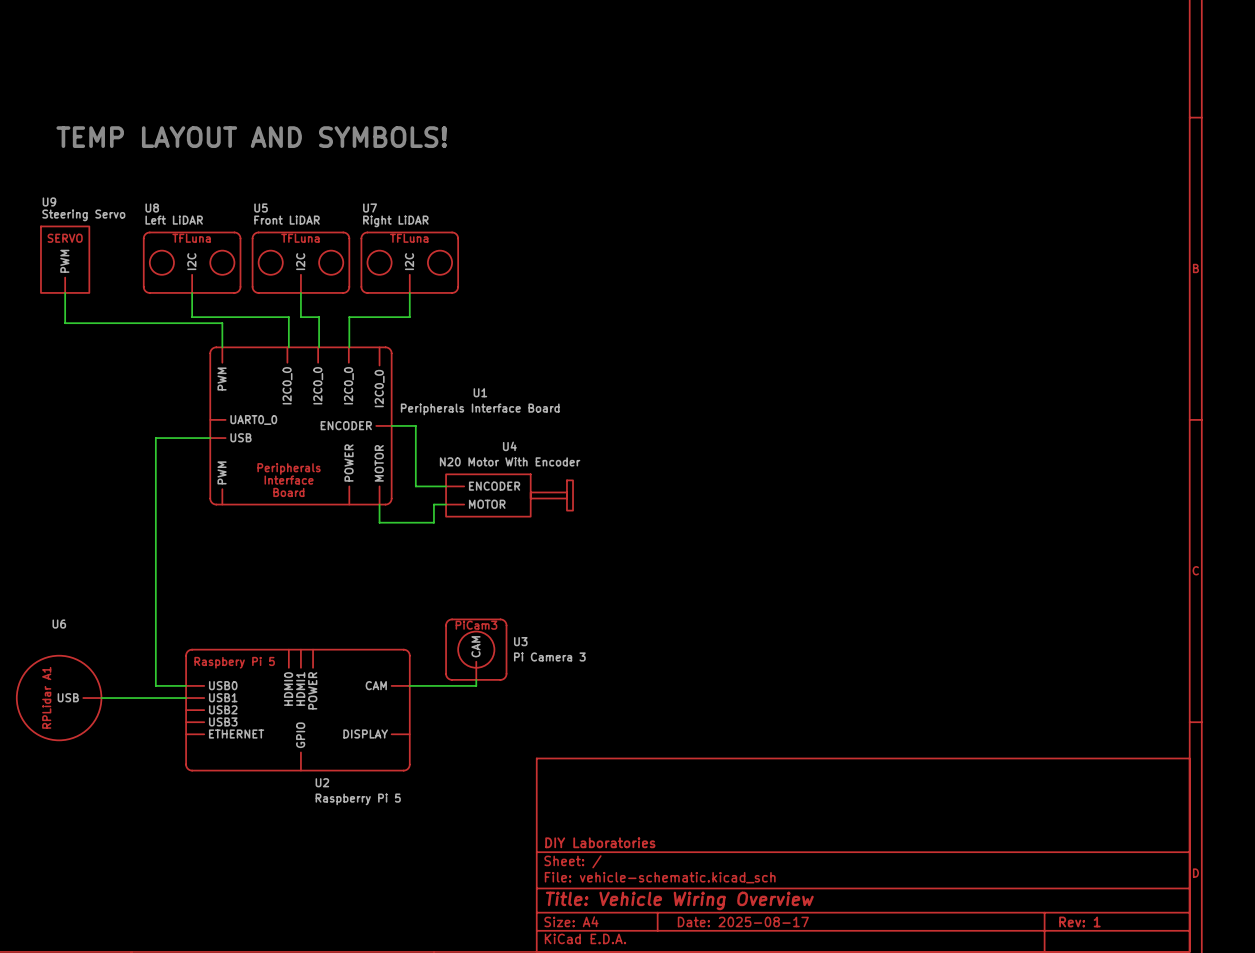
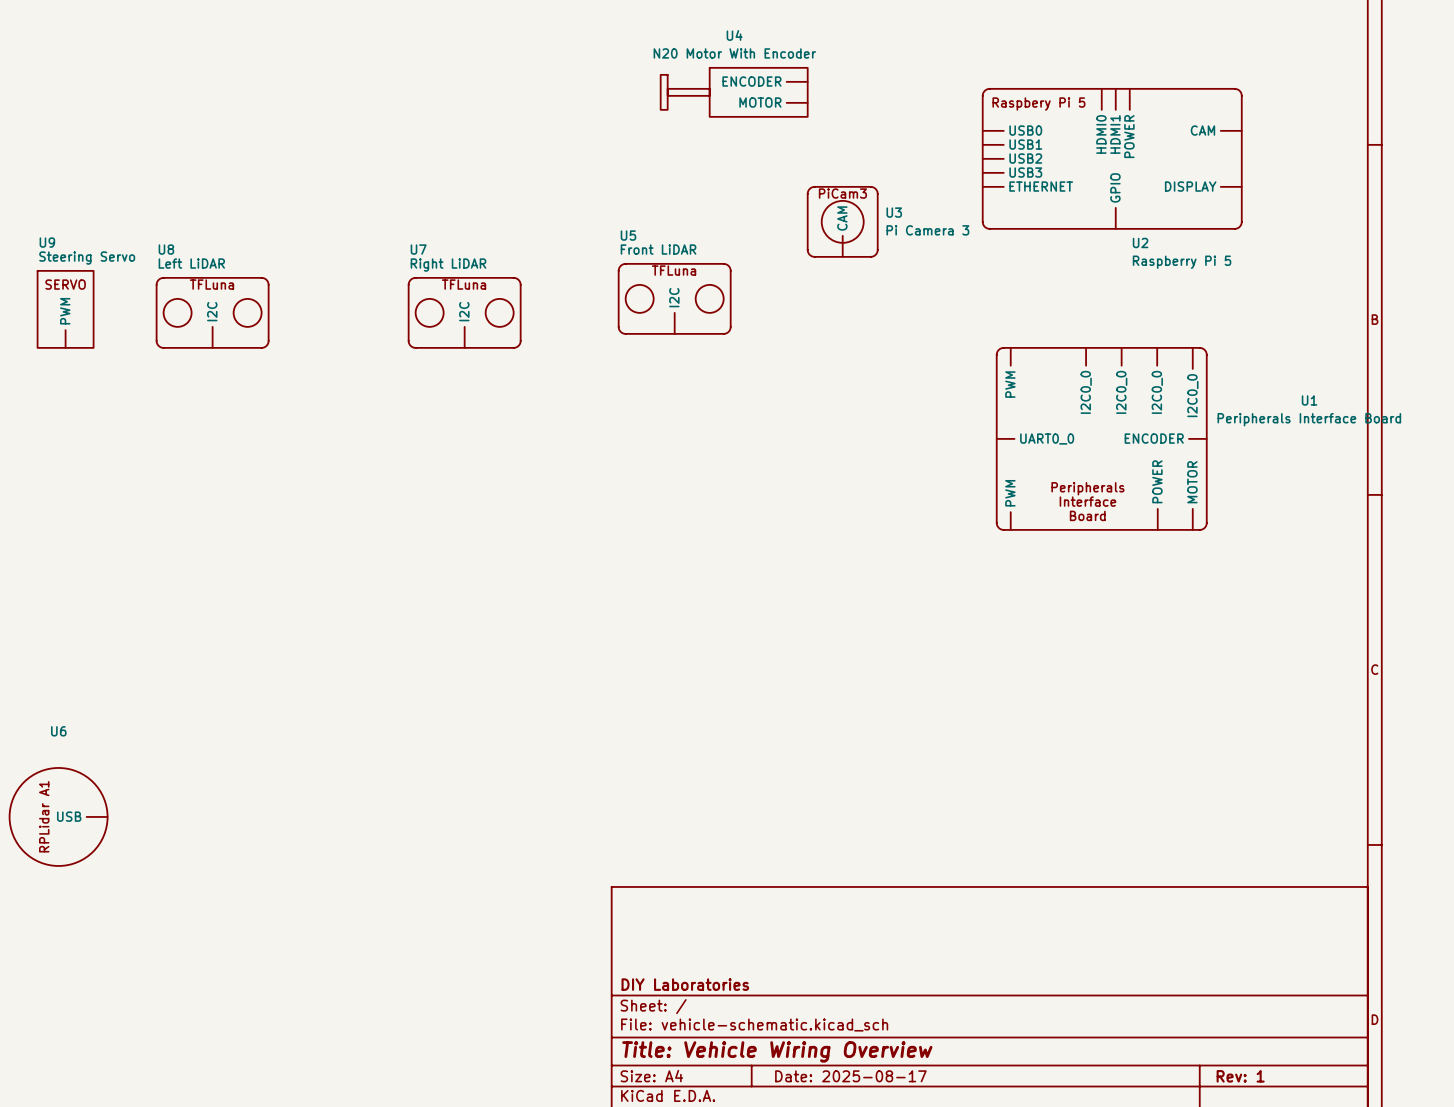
text: TEMP LAYOUT AND SYMBOLS! (251, 137) -> none
U5 position: (300, 262) -> (674, 298)
wire: (65, 292) (65, 323) (222, 323) (222, 347) -> none
wire: (192, 292) (192, 317) (288, 317) (288, 347) -> none
wire: (300, 292) (300, 317) (319, 317) (319, 347) -> none
wire: (409, 292) (409, 317) (349, 317) (349, 347) -> none
U1 symbol: [210, 347, 392, 505] -> [996, 347, 1207, 530]
wire: (391, 425) (415, 425) (415, 486) (446, 486) -> none
wire: (210, 438) (155, 438) (155, 685) (186, 685) -> none
U4 flip: as is (509, 495) -> left-right (734, 92)
U4 position: (509, 495) -> (734, 92)
wire: (379, 504) (379, 522) (433, 522) (433, 504) (446, 504) -> none
U3 position: (476, 649) -> (842, 221)
wire: (476, 679) (476, 685) (409, 685) -> none
wire: (101, 698) (186, 698) -> none
U2 position: (297, 710) -> (1112, 158)

